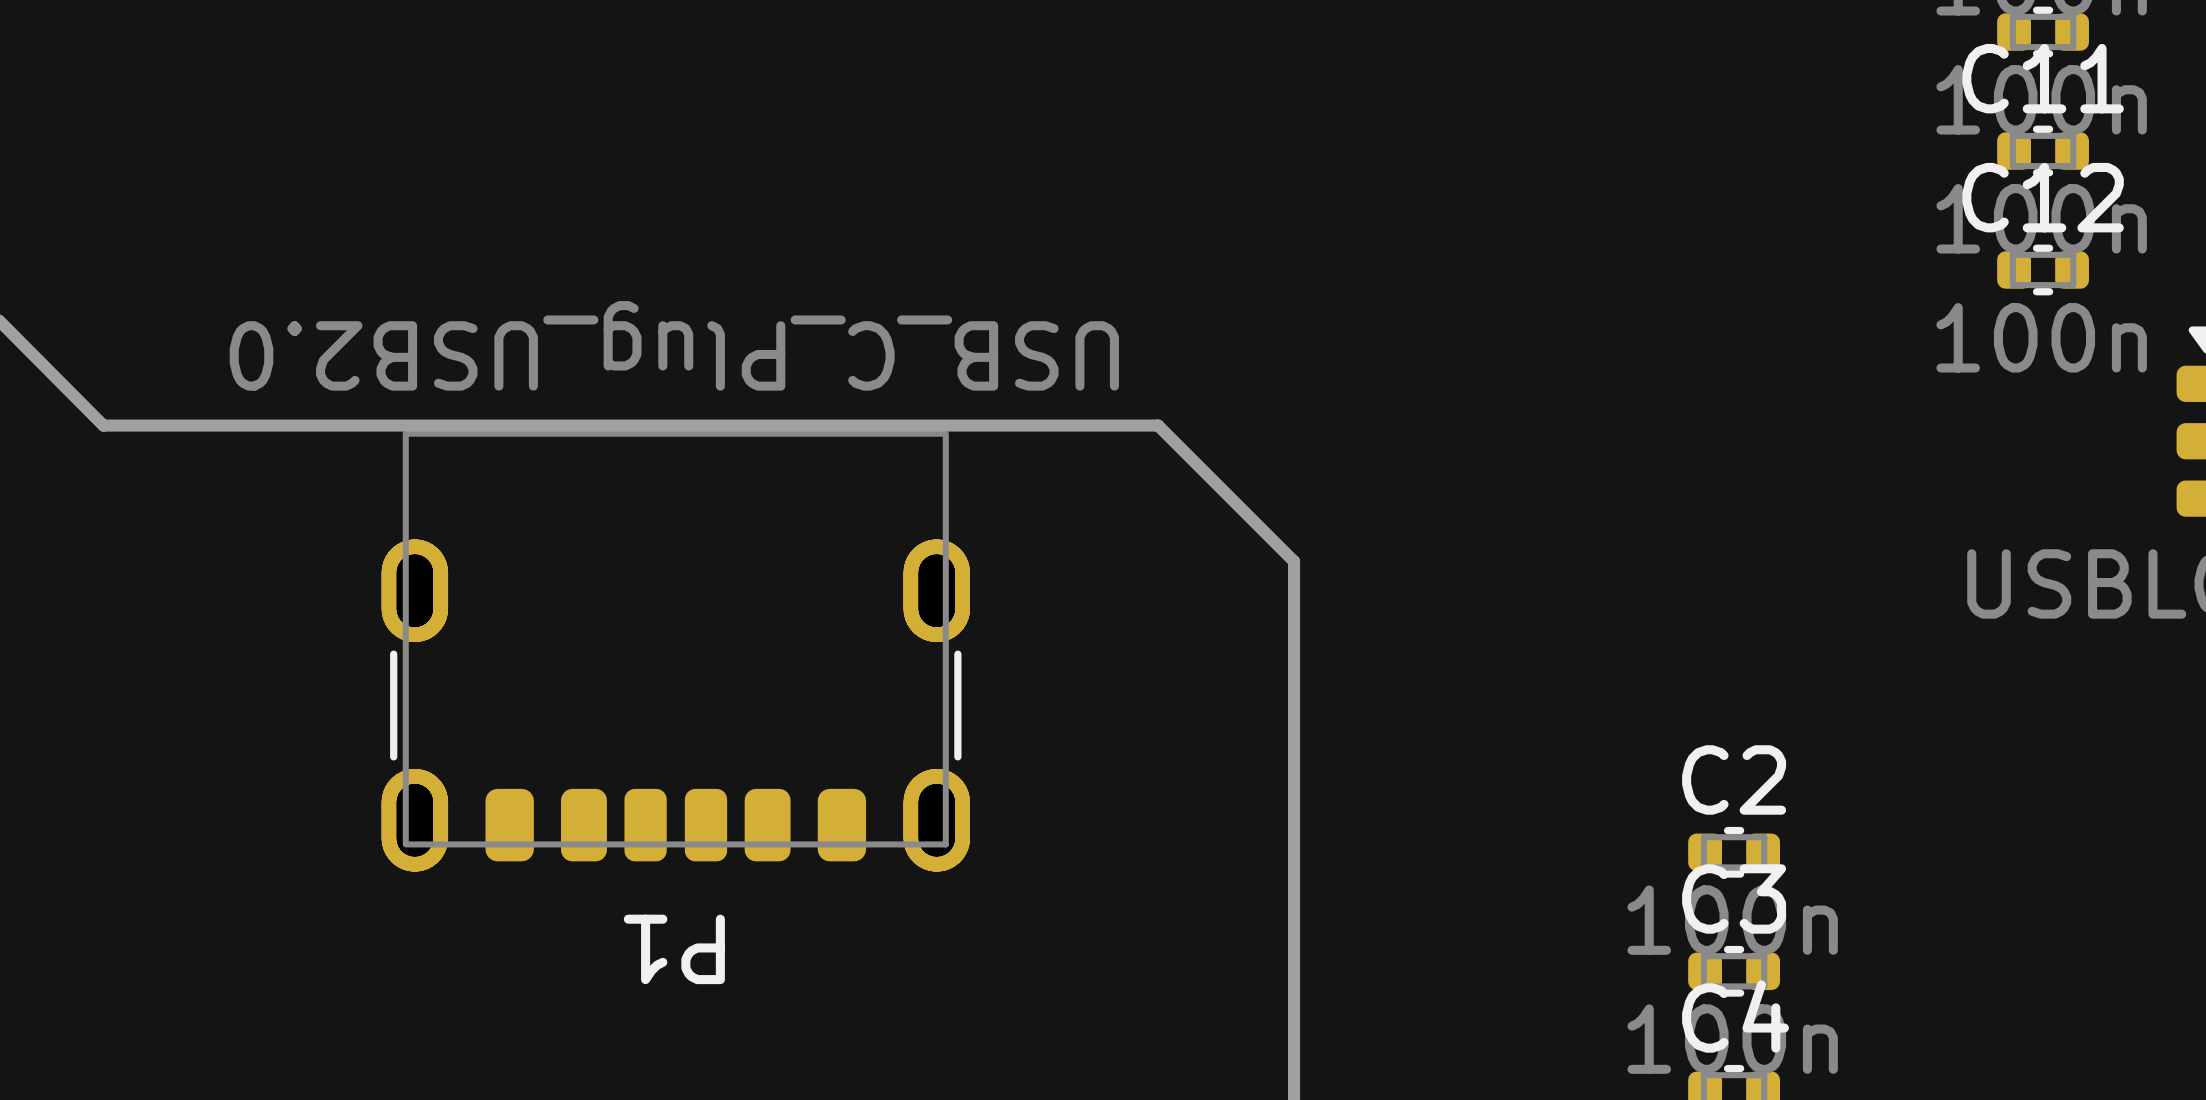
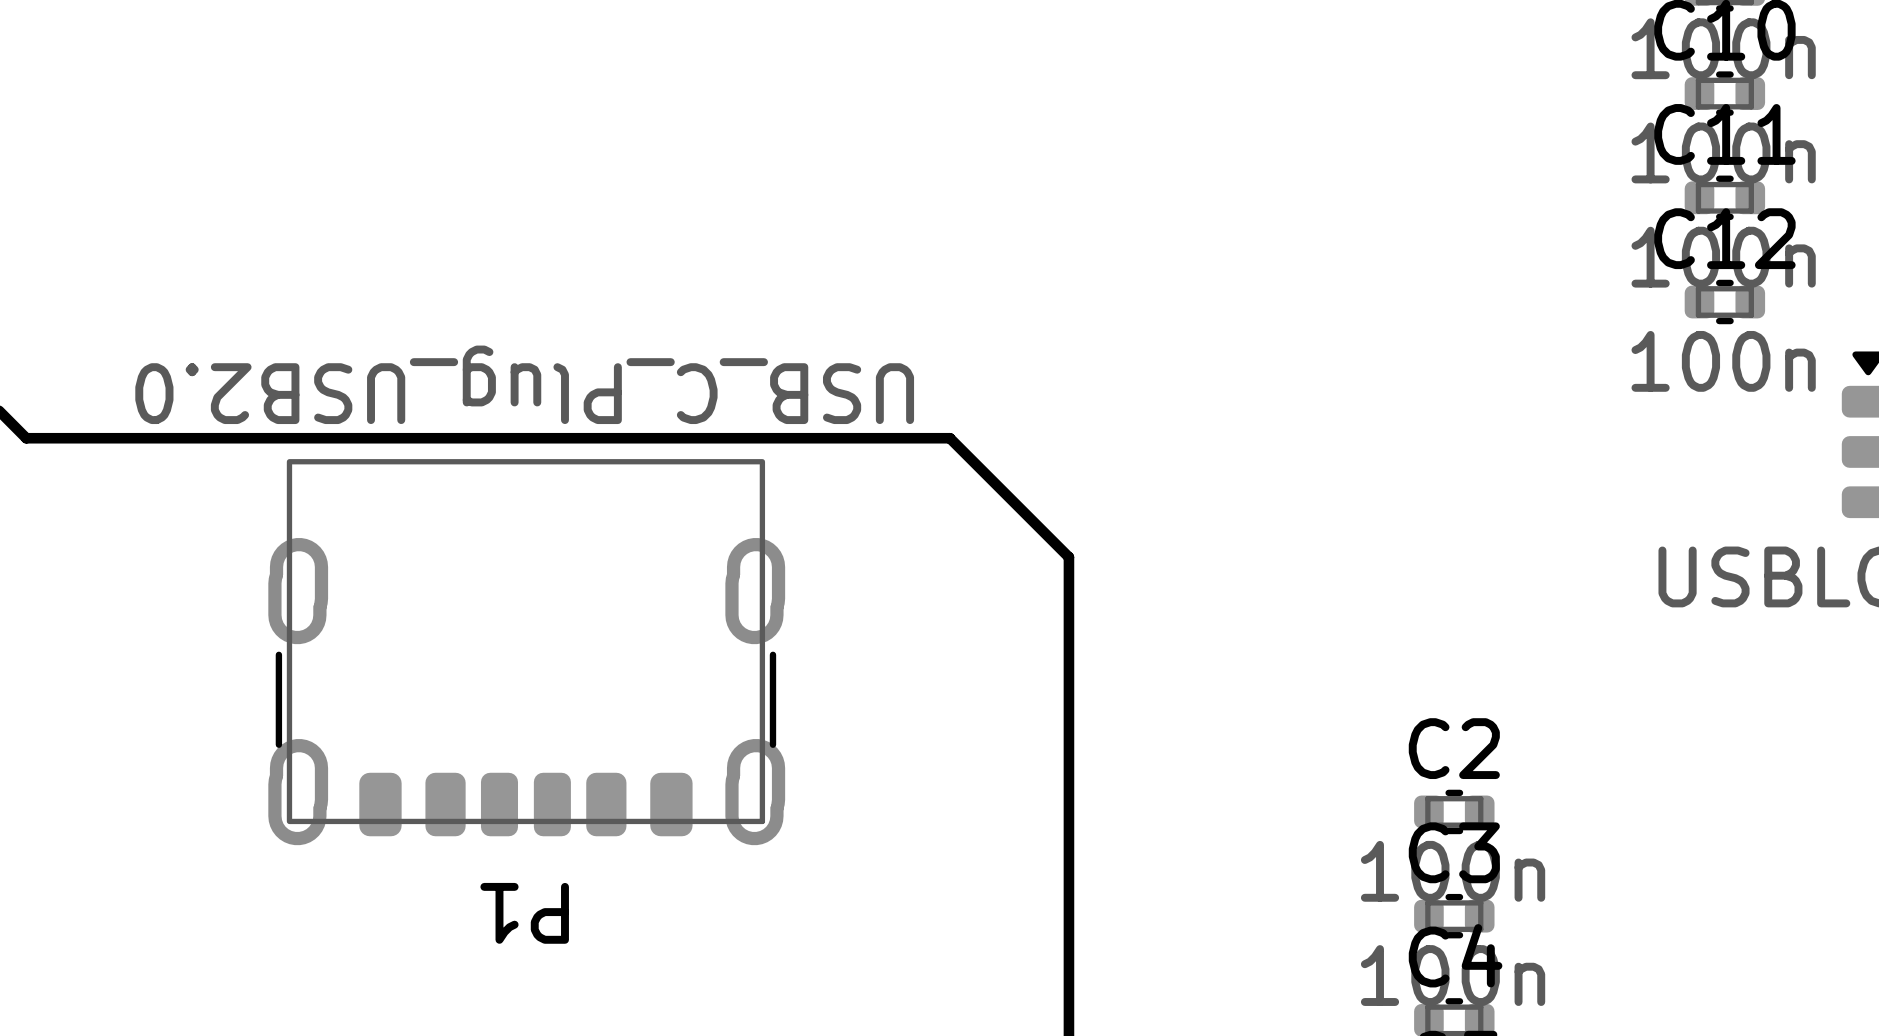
P1 position: (675, 651) -> (525, 652)

